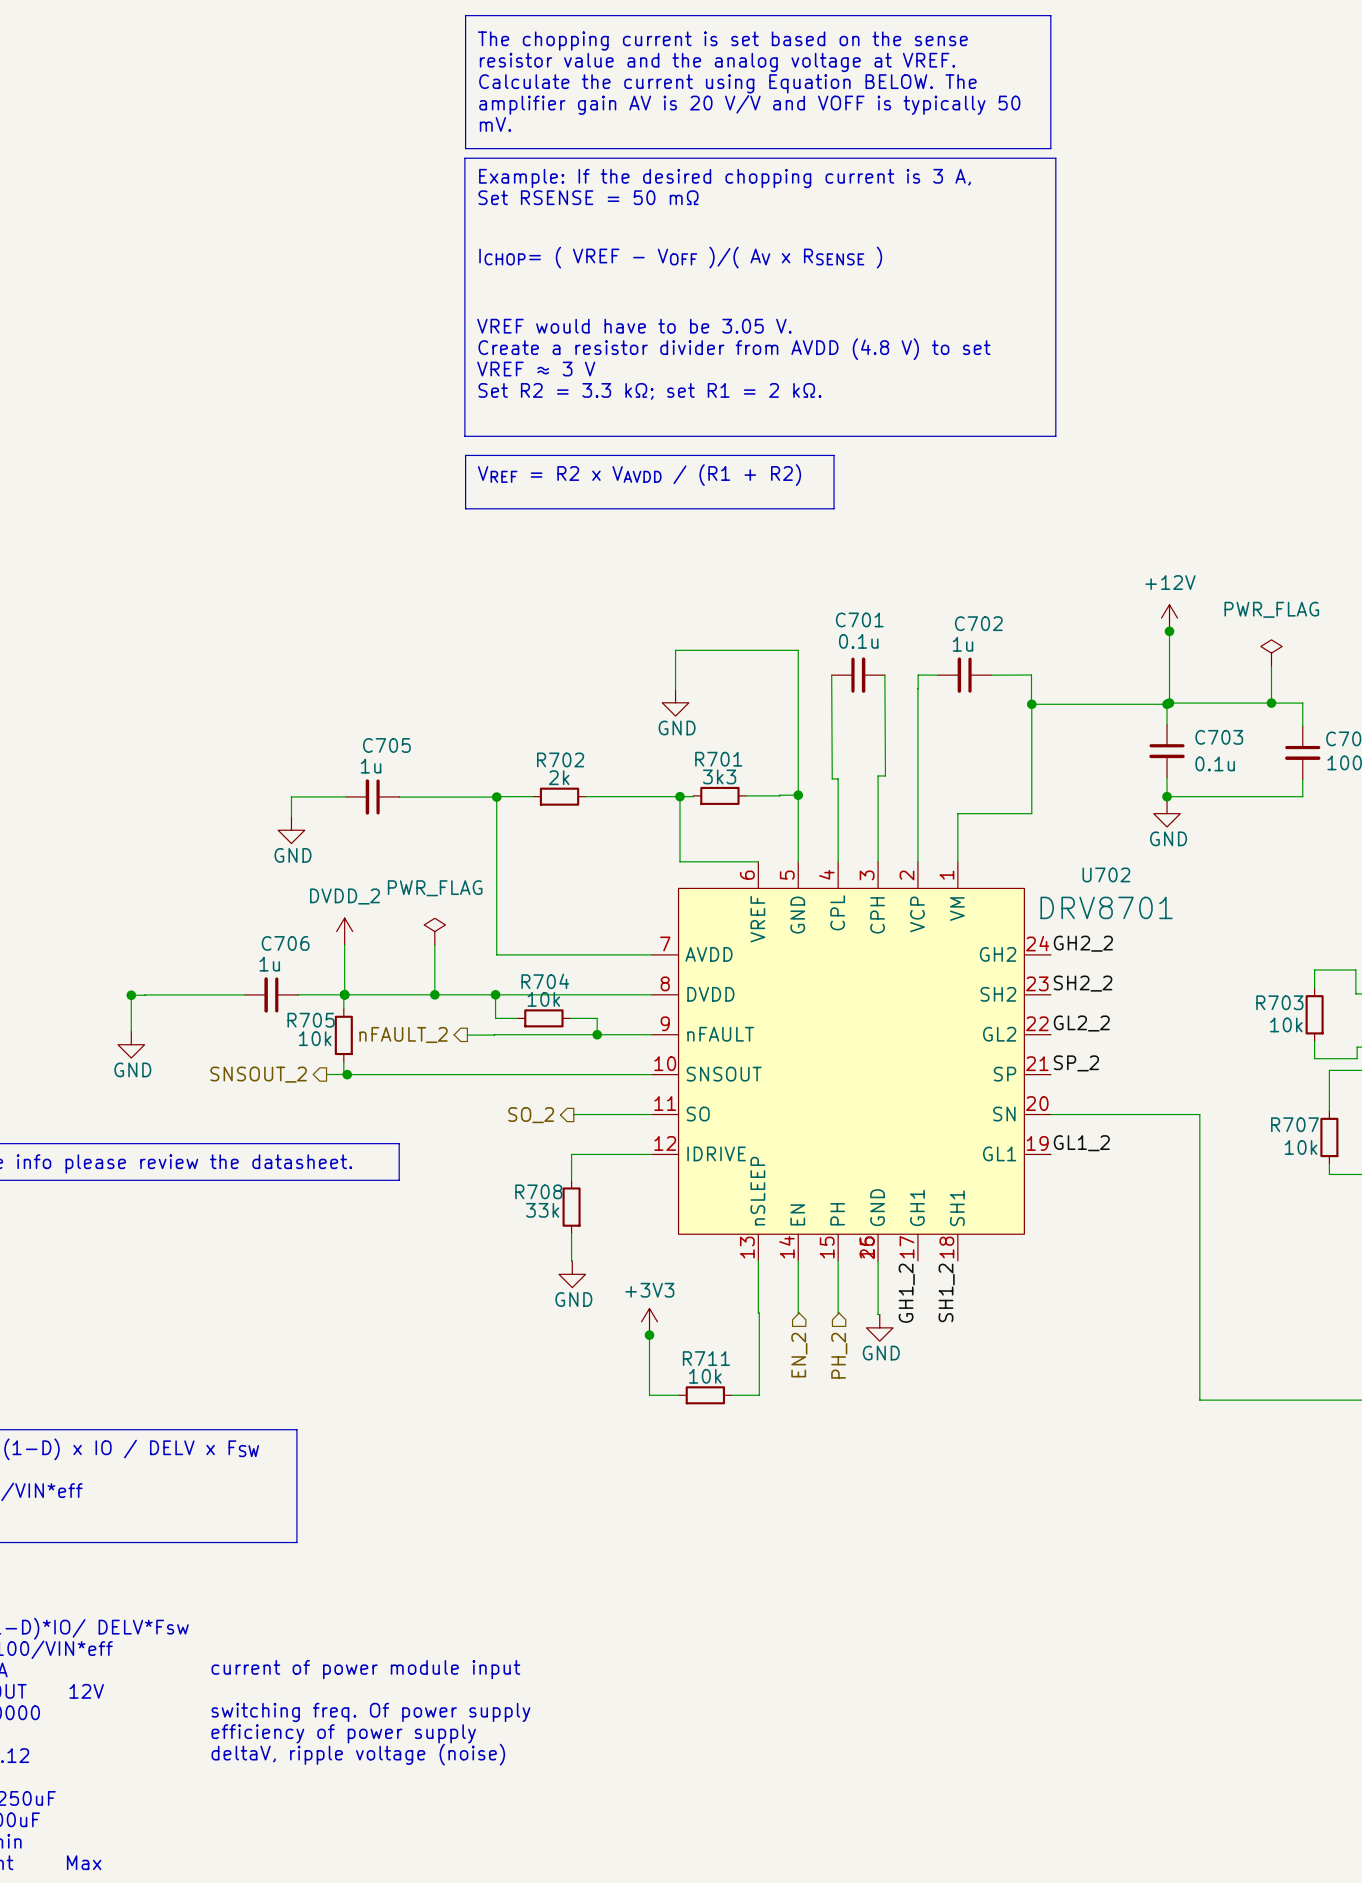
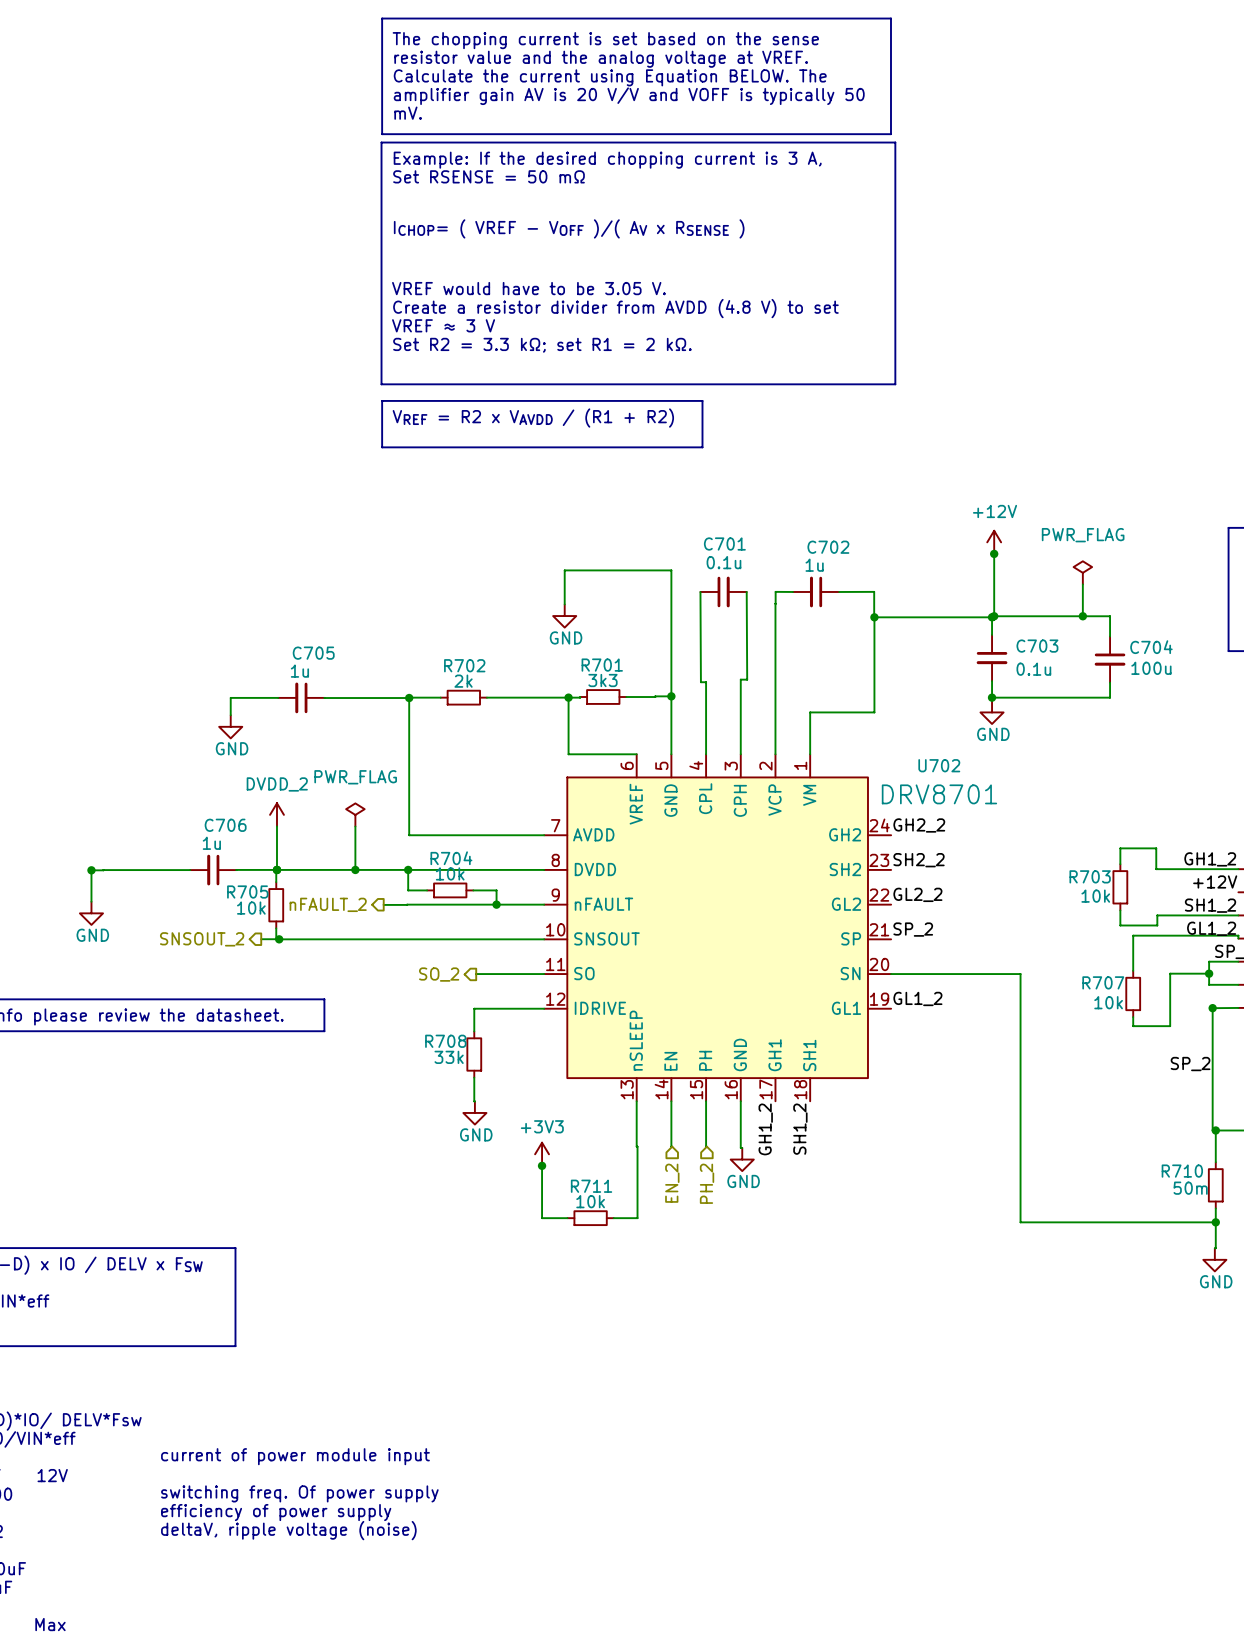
U702 symbol: [651, 861, 1051, 1261] -> [544, 754, 892, 1102]

